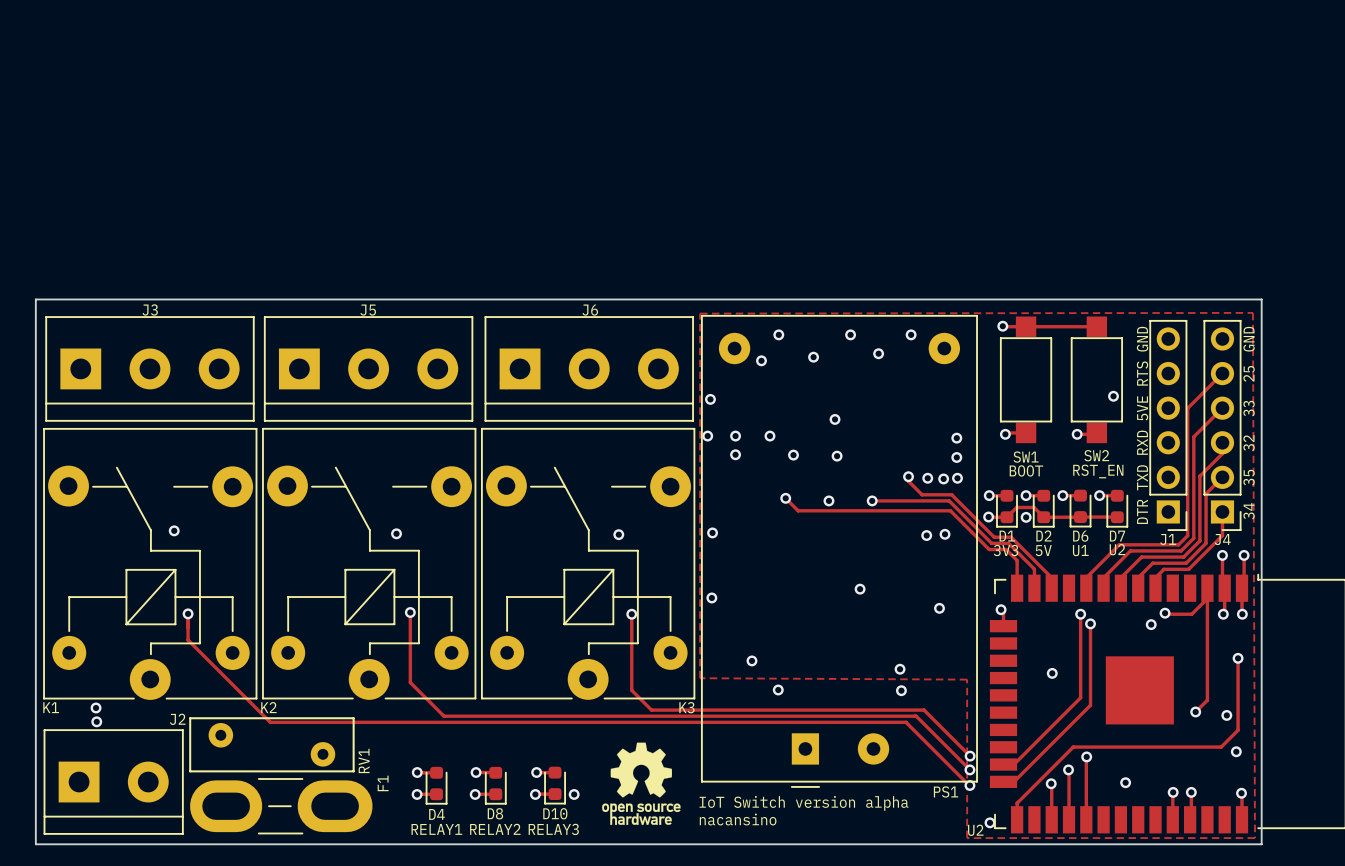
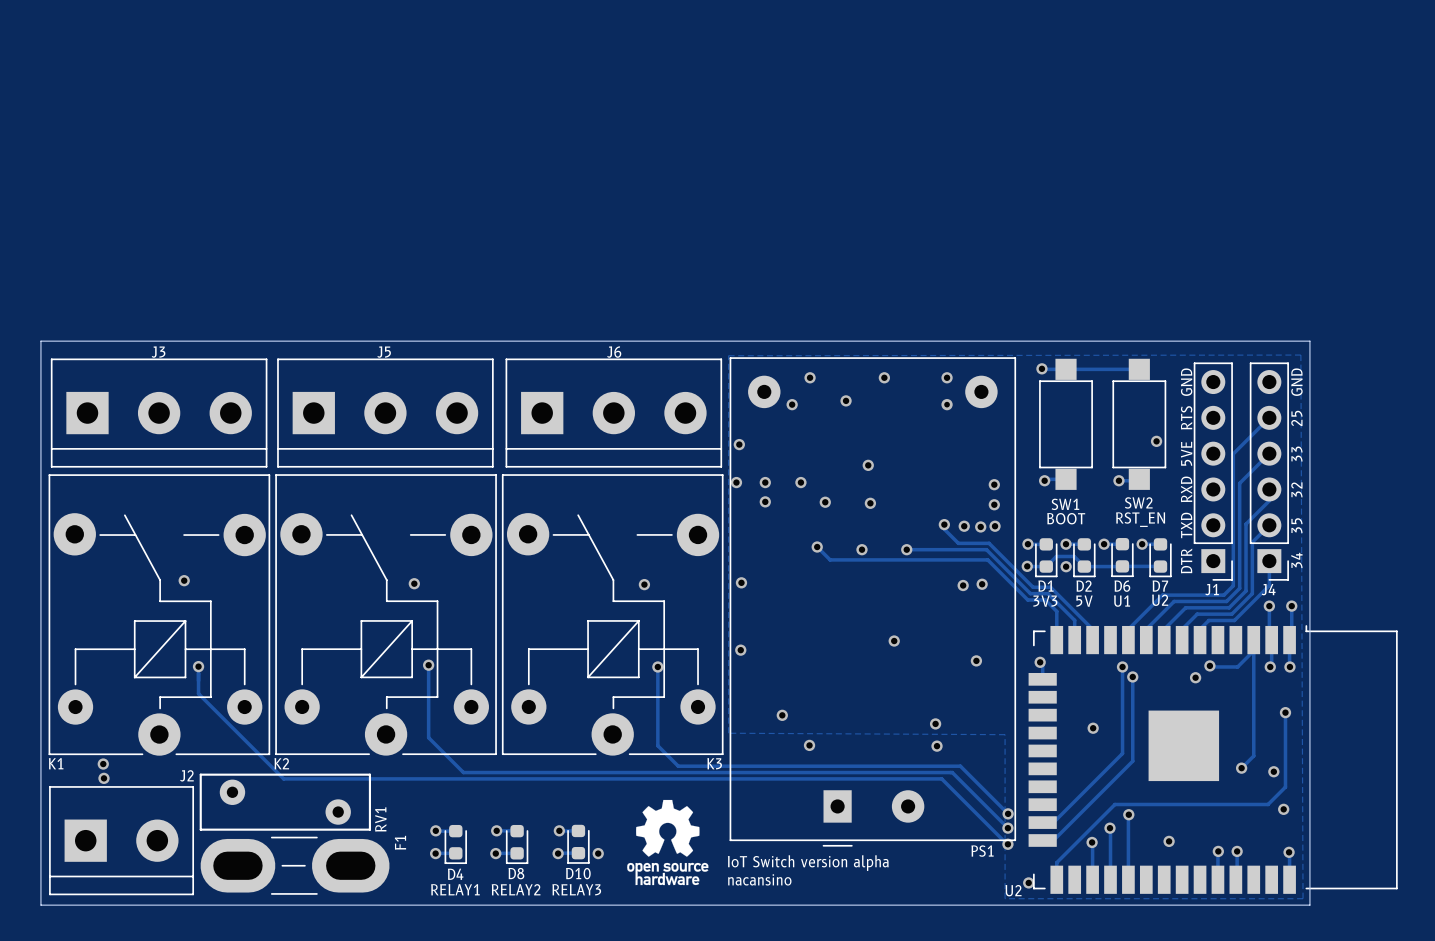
via: (878, 353) -> none
via: none -> (947, 404)

